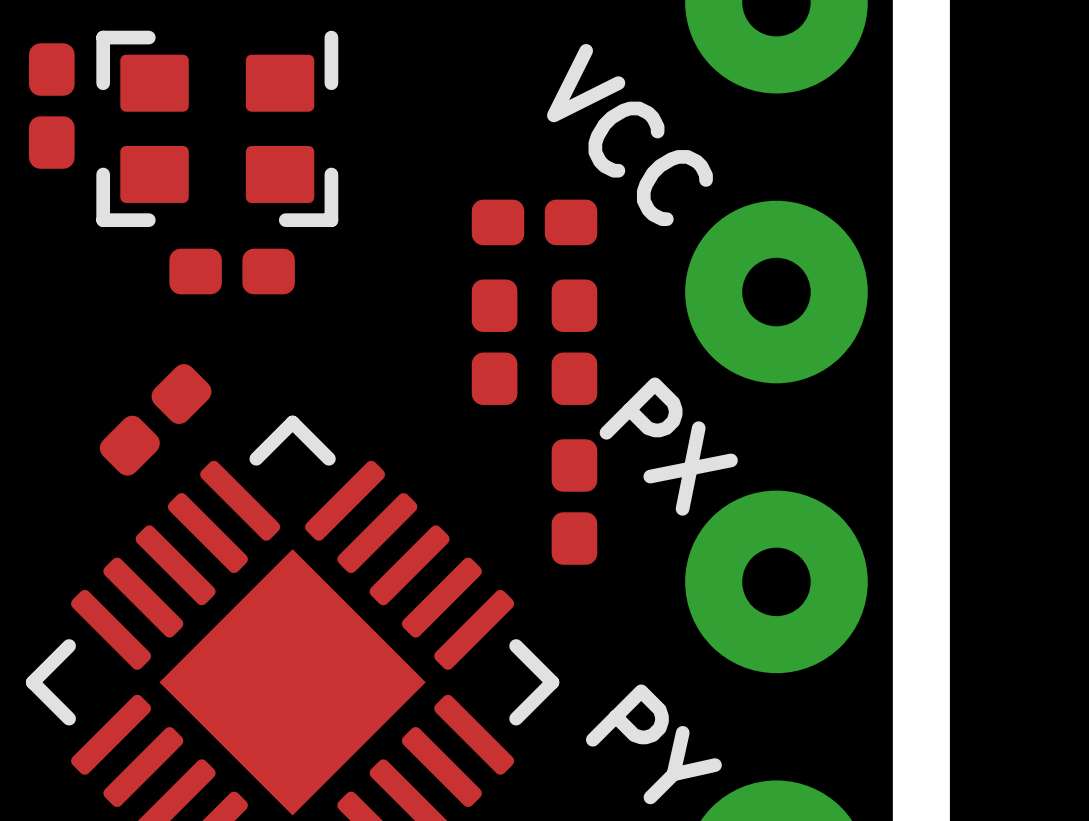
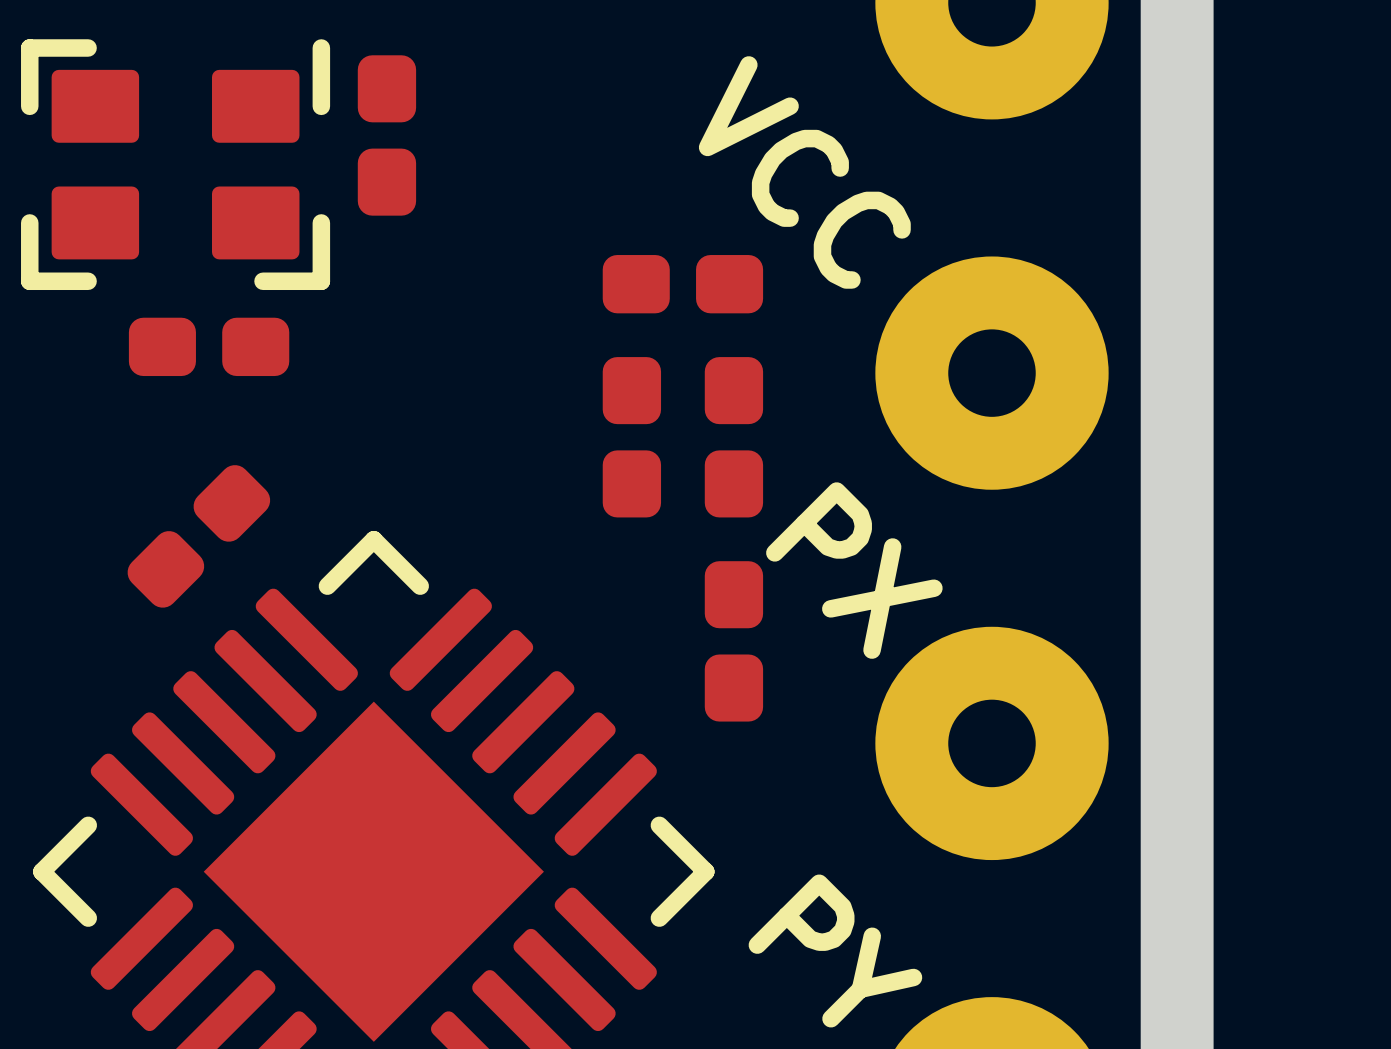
part position: (51, 106) -> (386, 135)
part position: (217, 128) -> (175, 164)
part position: (232, 271) -> (209, 346)

